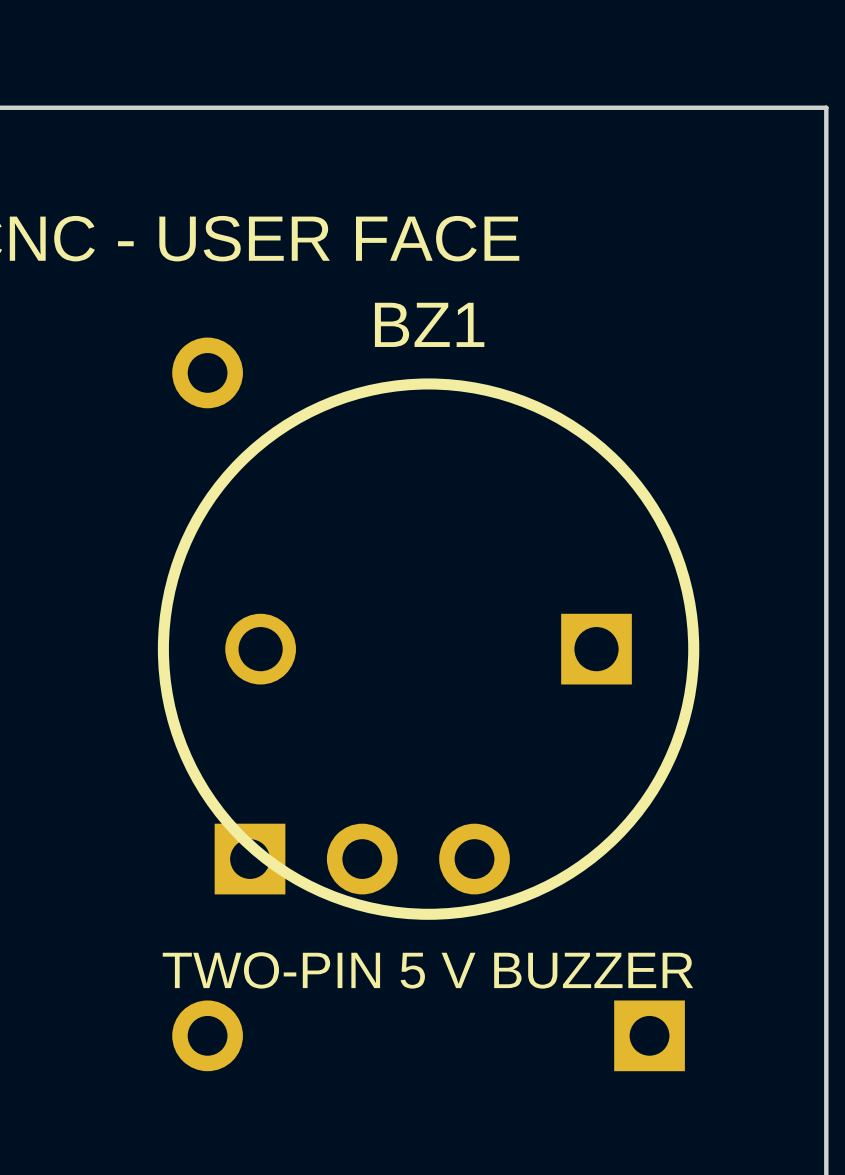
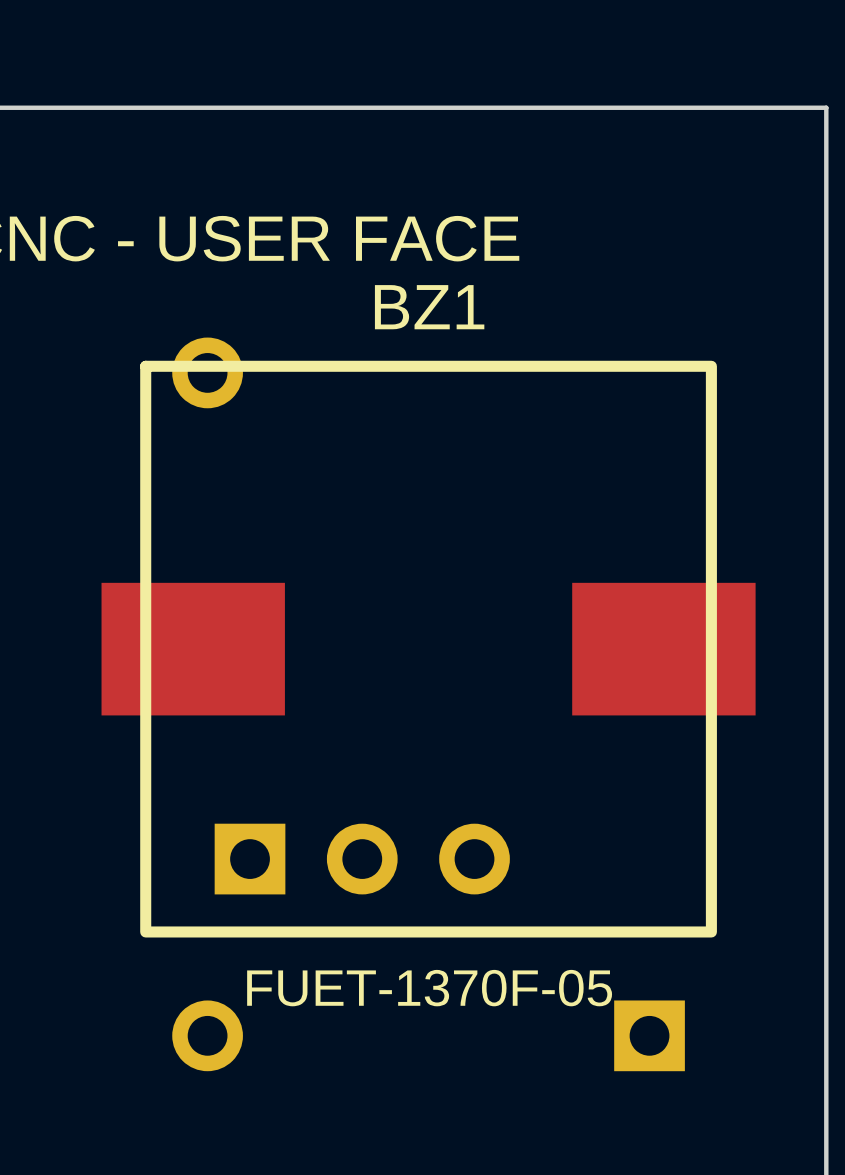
BZ1 footprint: [157, 378, 700, 920] -> [101, 360, 756, 938]
BZ1 value: TWO-PIN 5 V BUZZER (427, 970) -> FUET-1370F-05 (429, 988)

